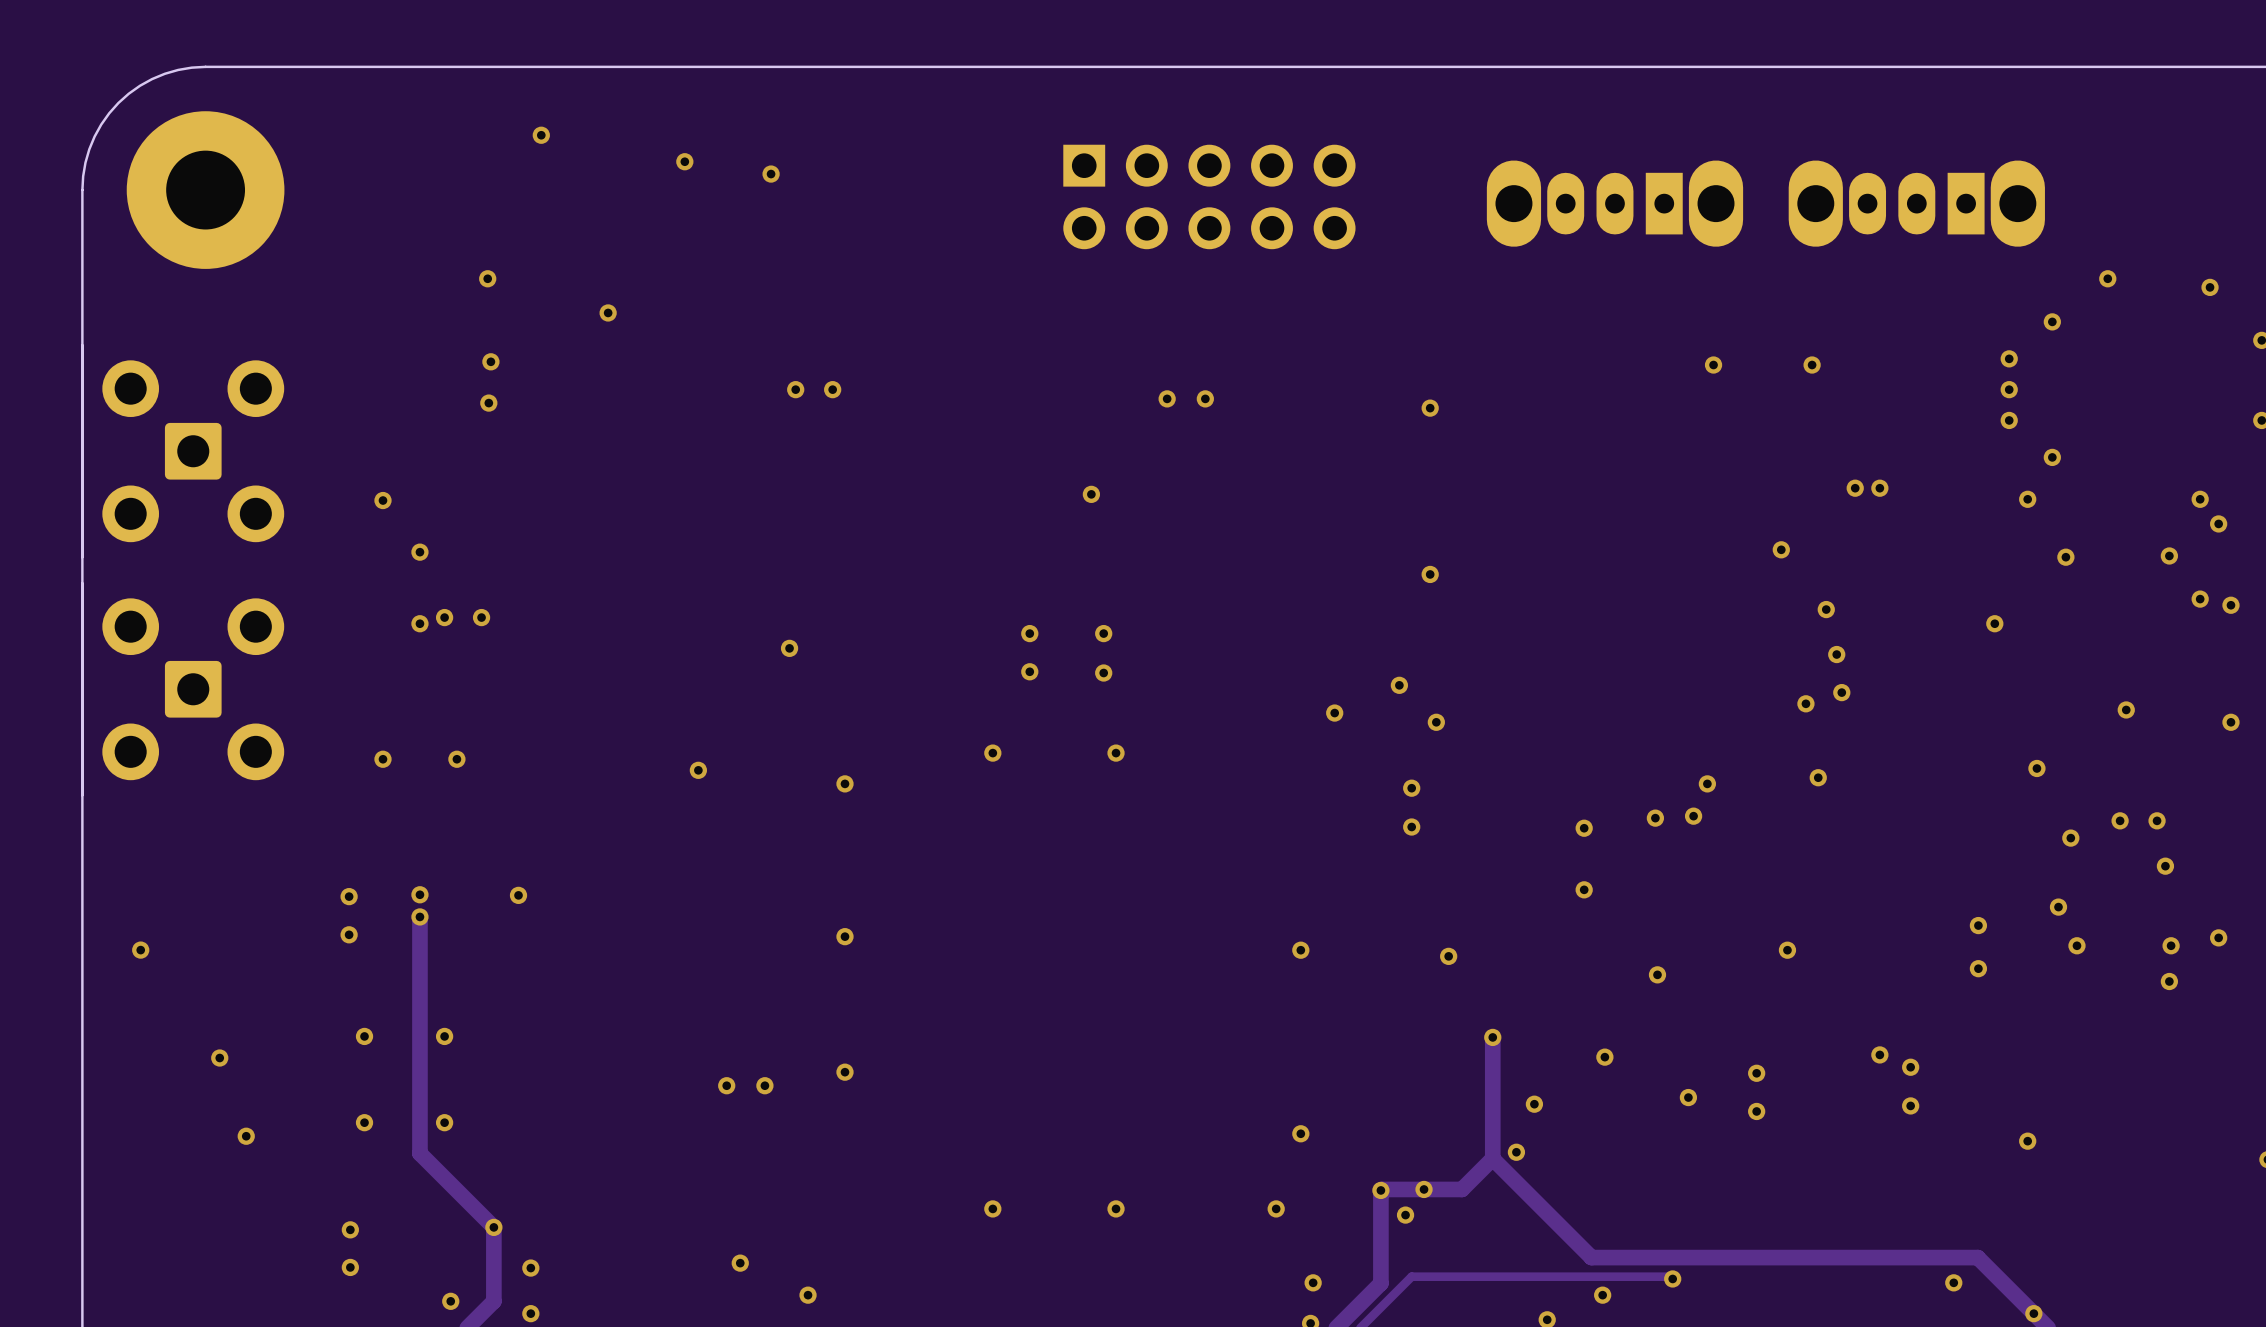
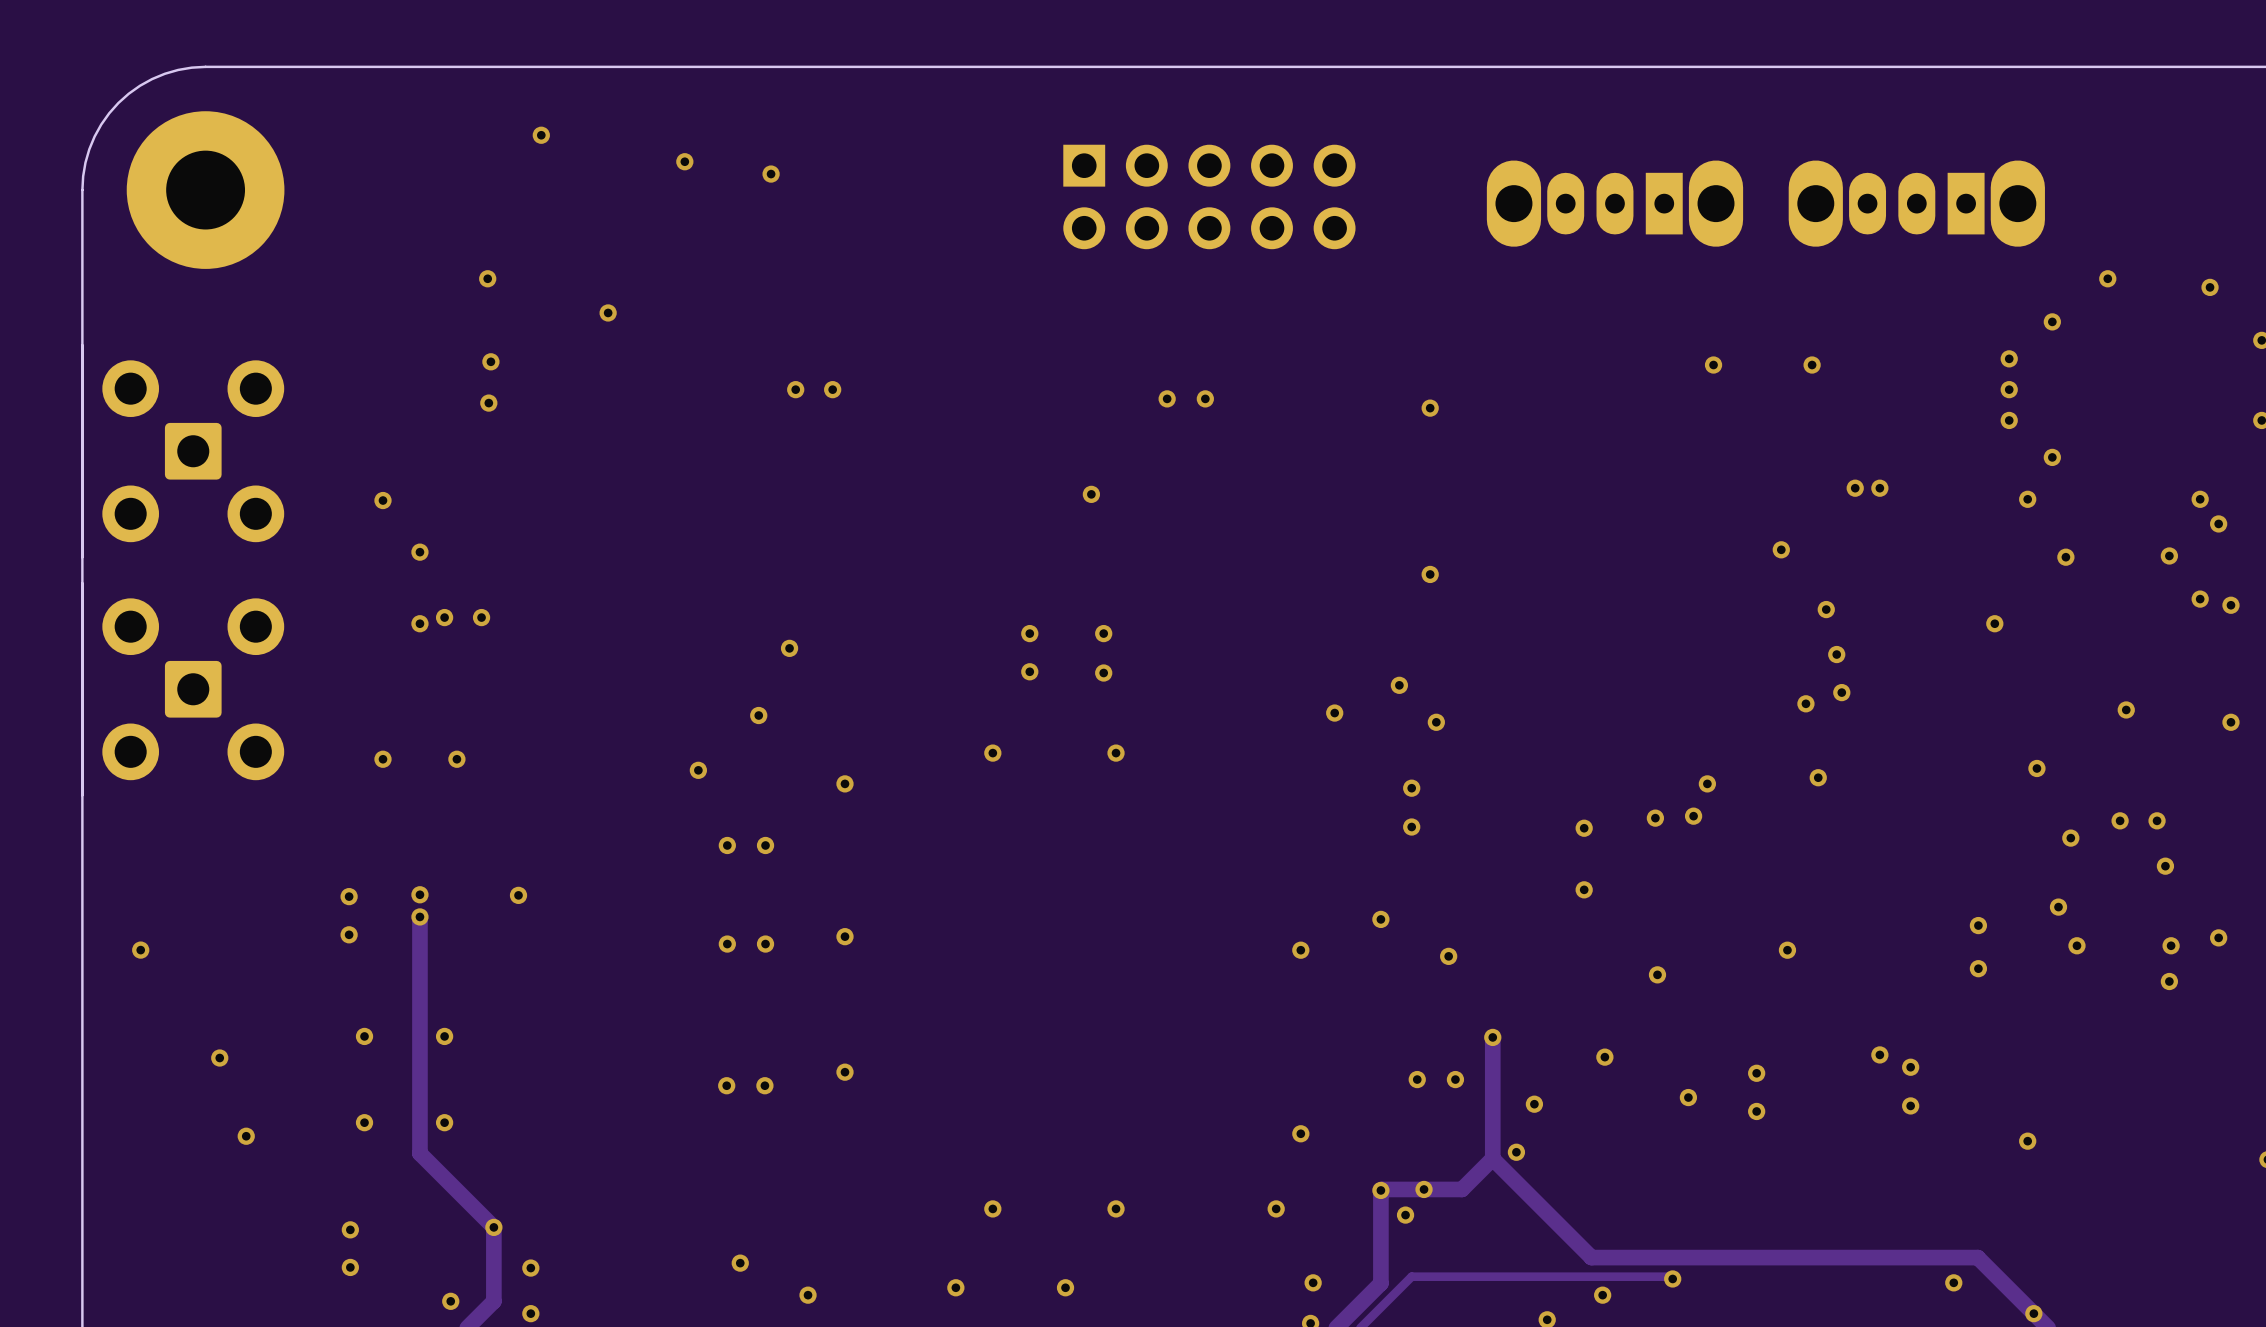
via: none -> (758, 715)
via: none -> (727, 845)
via: none -> (765, 845)
via: none -> (1380, 919)
via: none -> (727, 944)
via: none -> (765, 944)
via: none -> (1417, 1079)
via: none -> (1455, 1079)
via: none -> (955, 1287)
via: none -> (1065, 1287)

